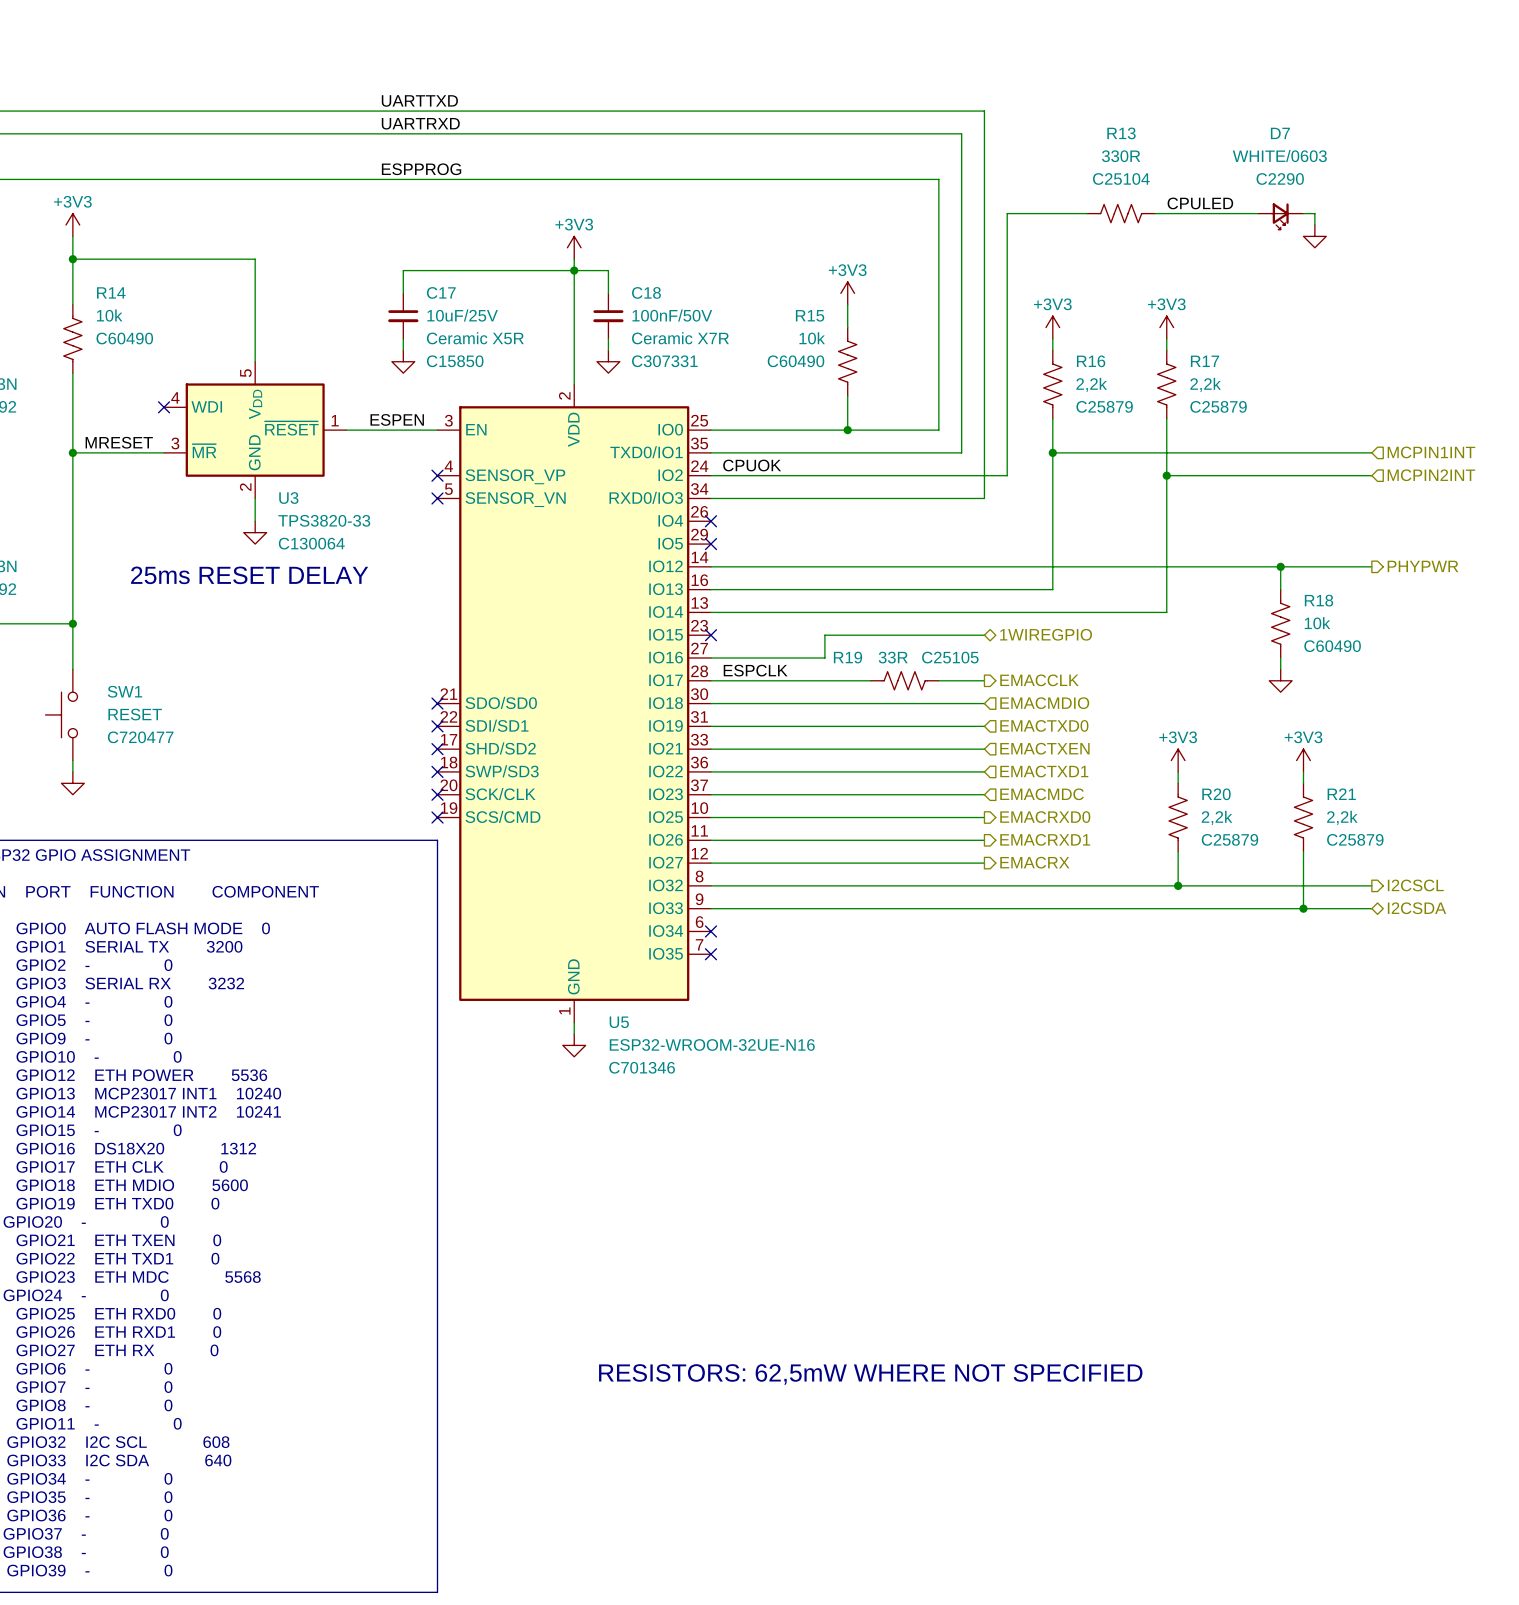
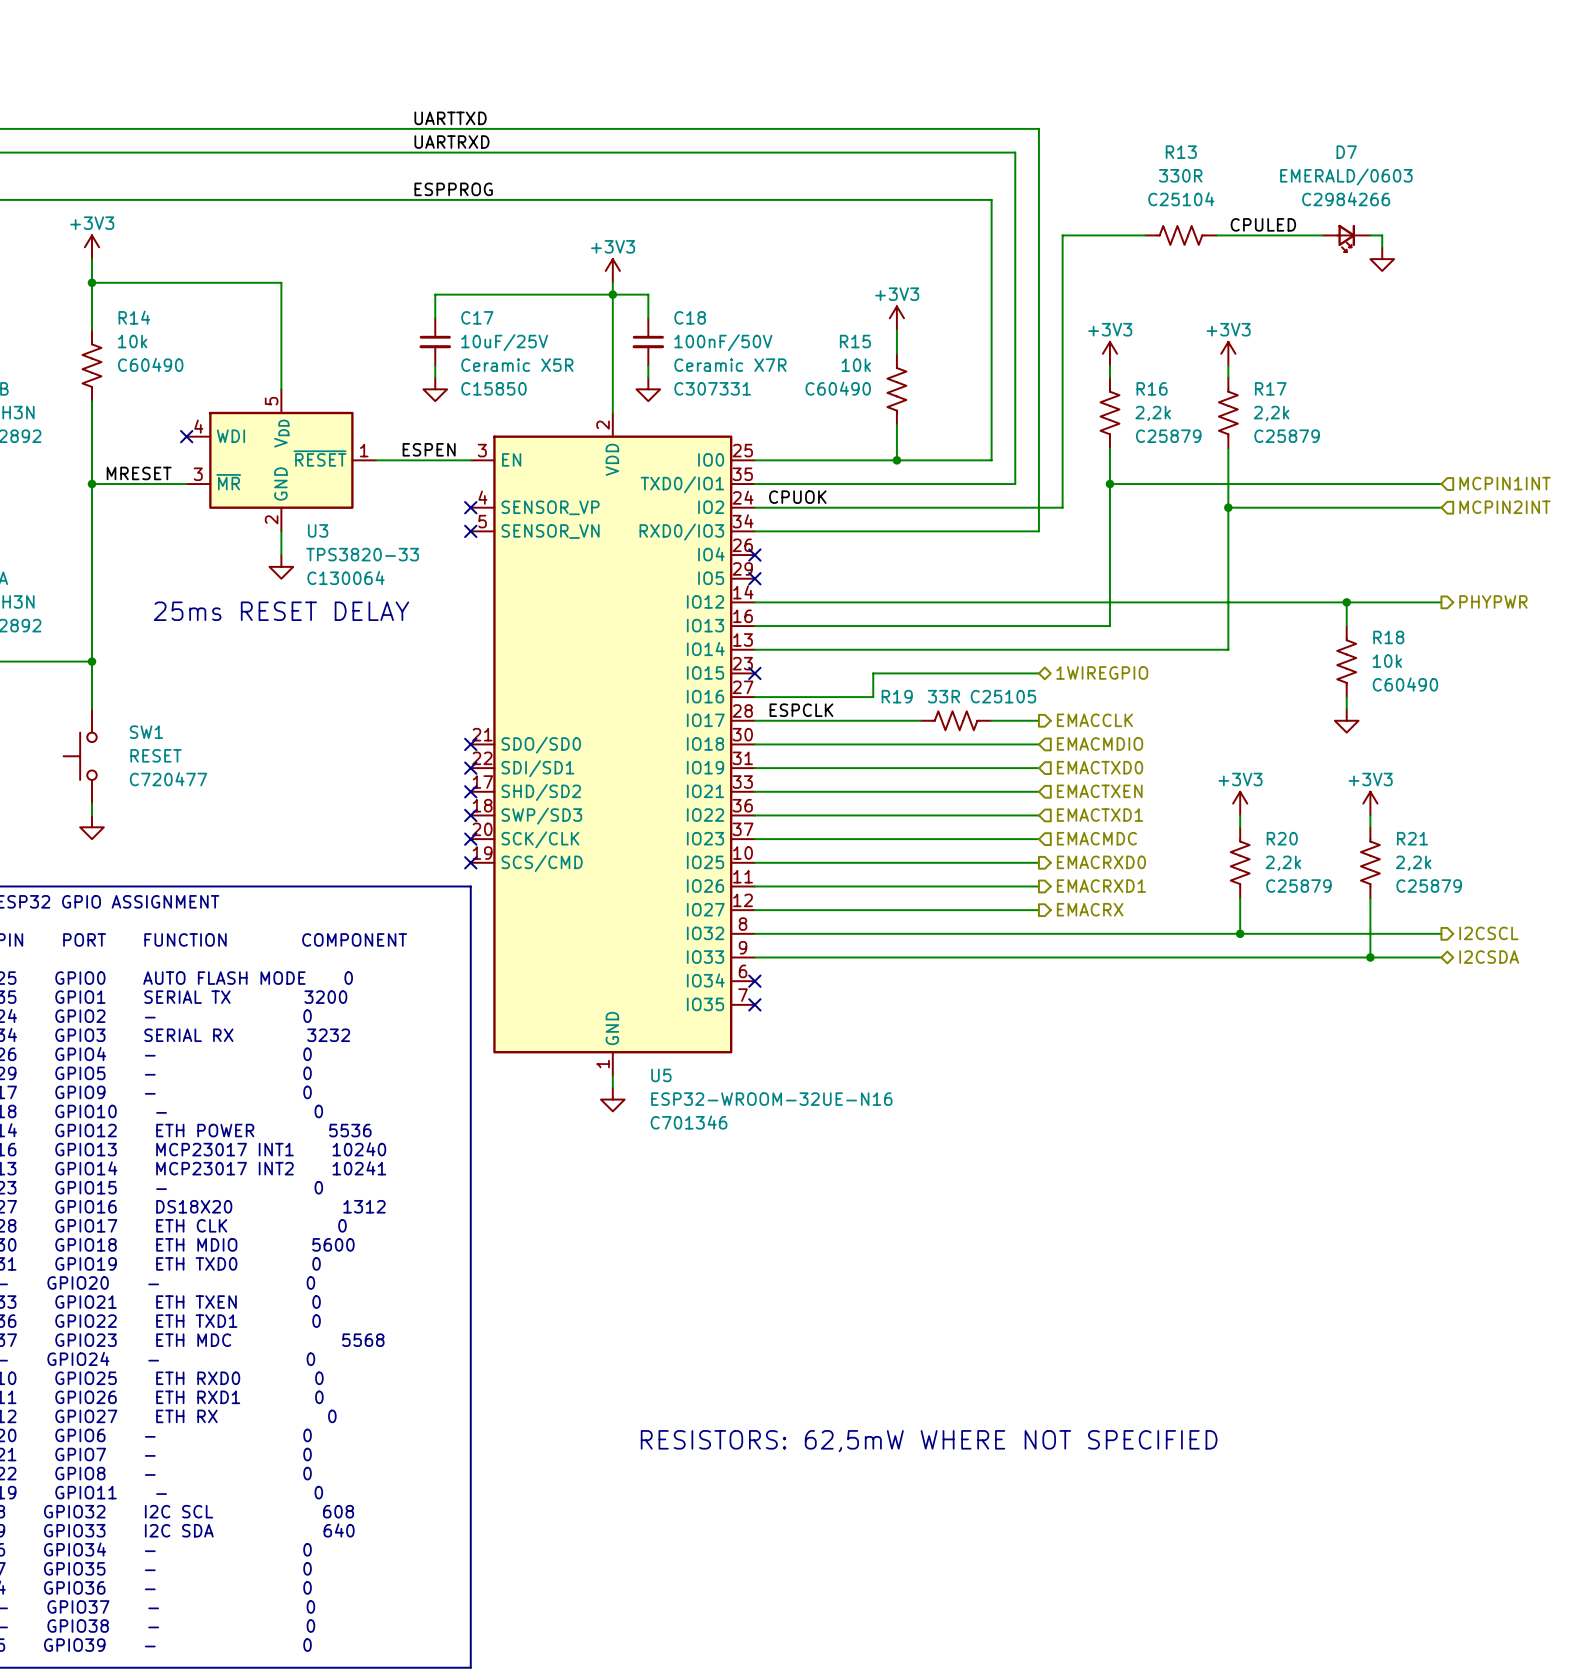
D7 value: WHITE/0603 (1279, 155) -> EMERALD/0603 (1346, 176)
D7 text: C2290 (1280, 178) -> C2984266 (1346, 199)

